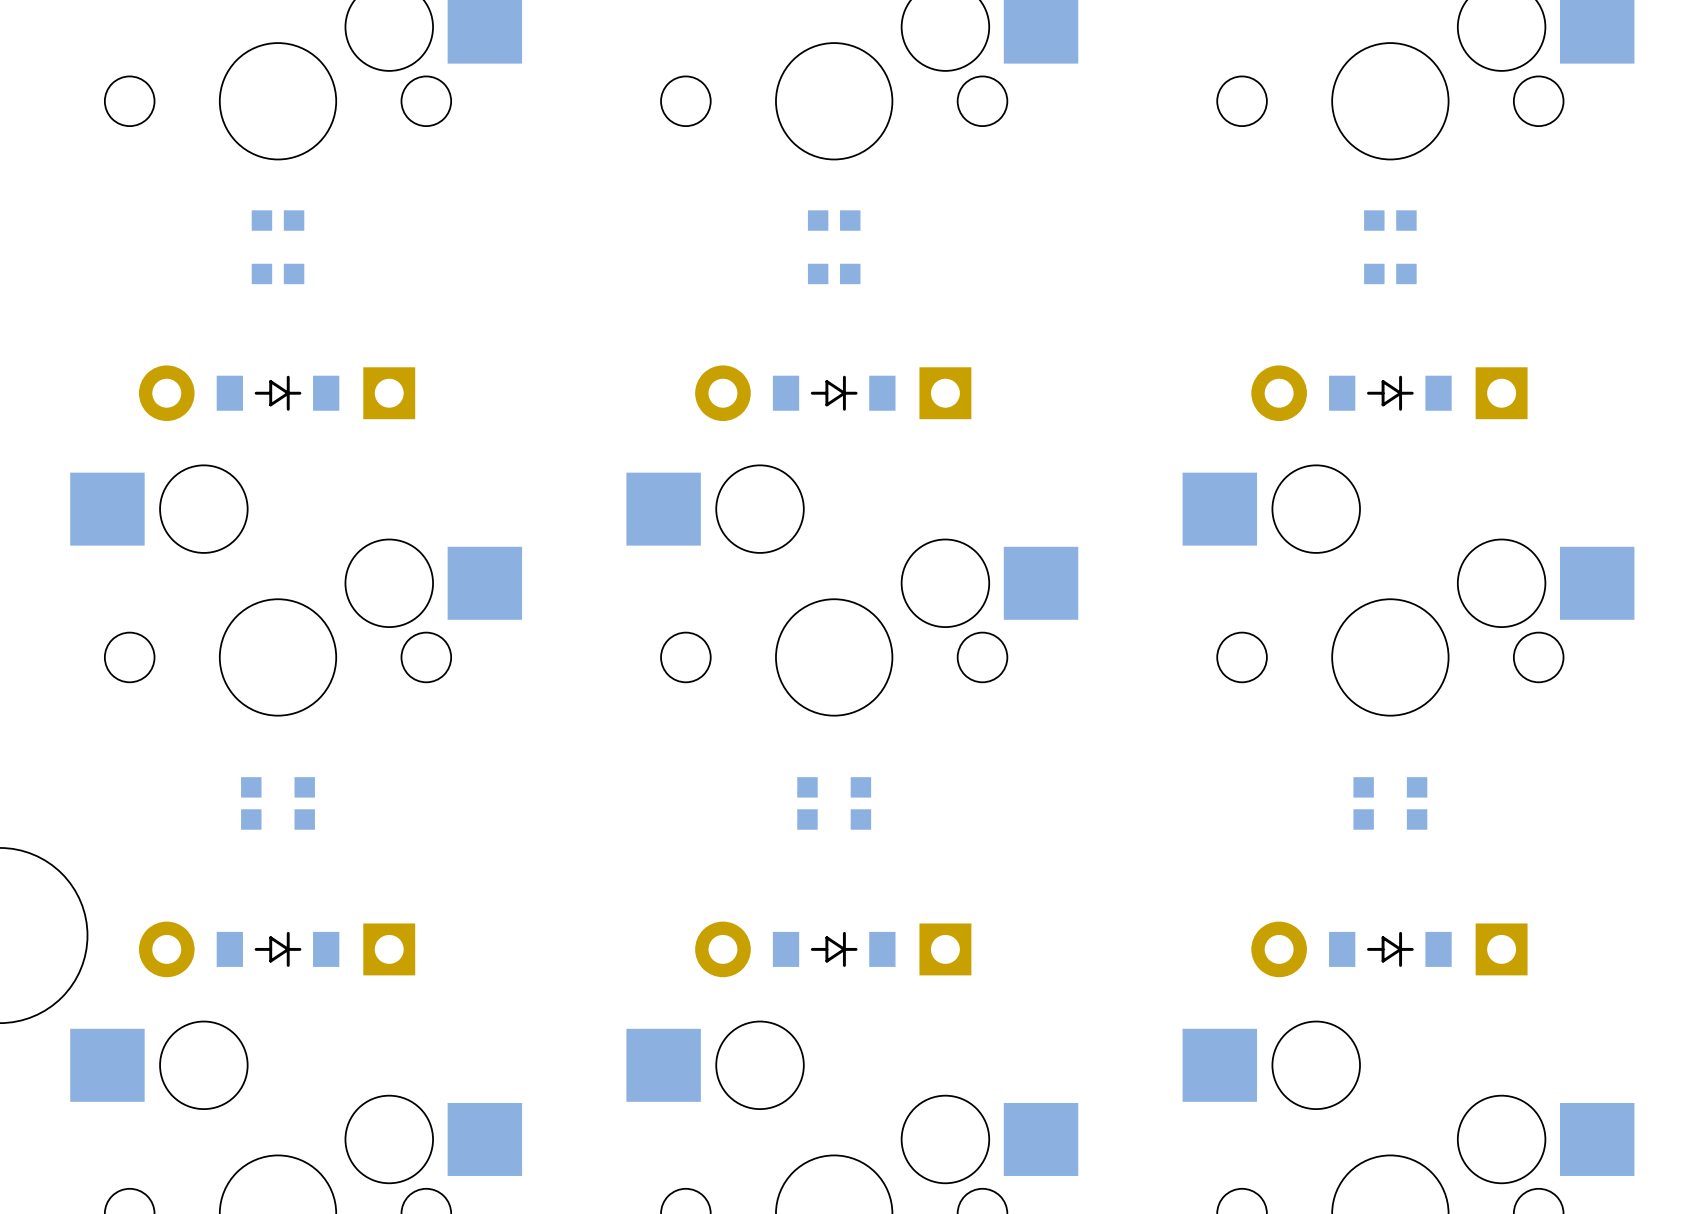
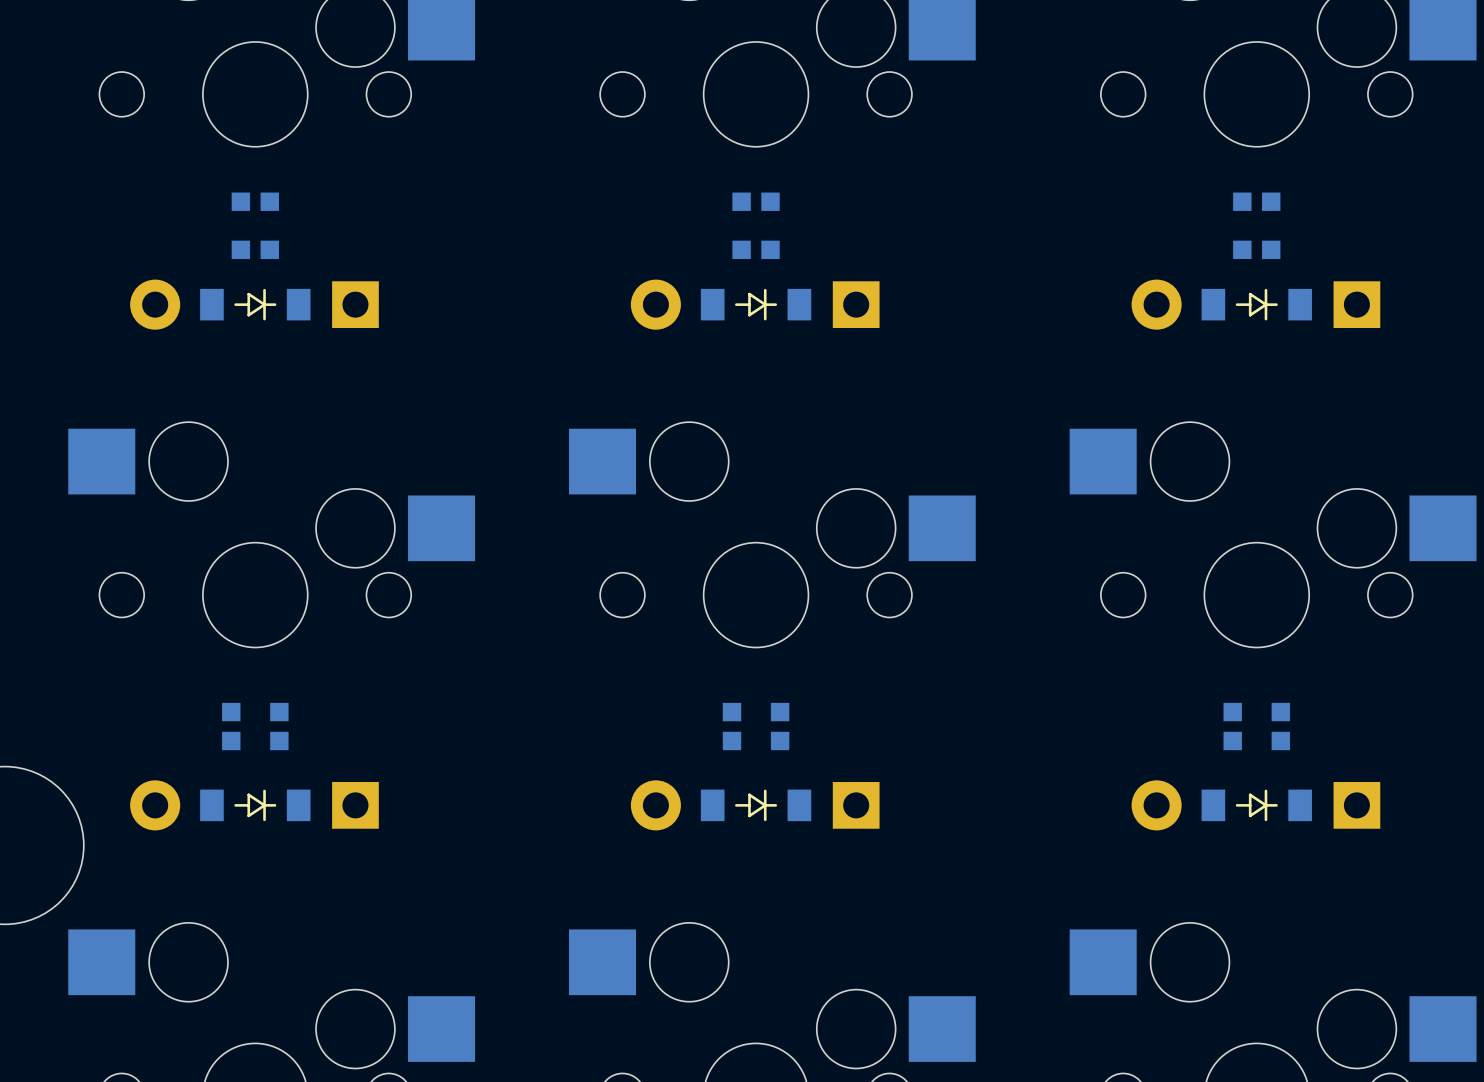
part position: (277, 393) -> (254, 304)
part position: (833, 393) -> (755, 304)
part position: (1389, 393) -> (1255, 304)
part position: (277, 949) -> (254, 805)
part position: (833, 949) -> (755, 805)
part position: (1389, 949) -> (1255, 805)

